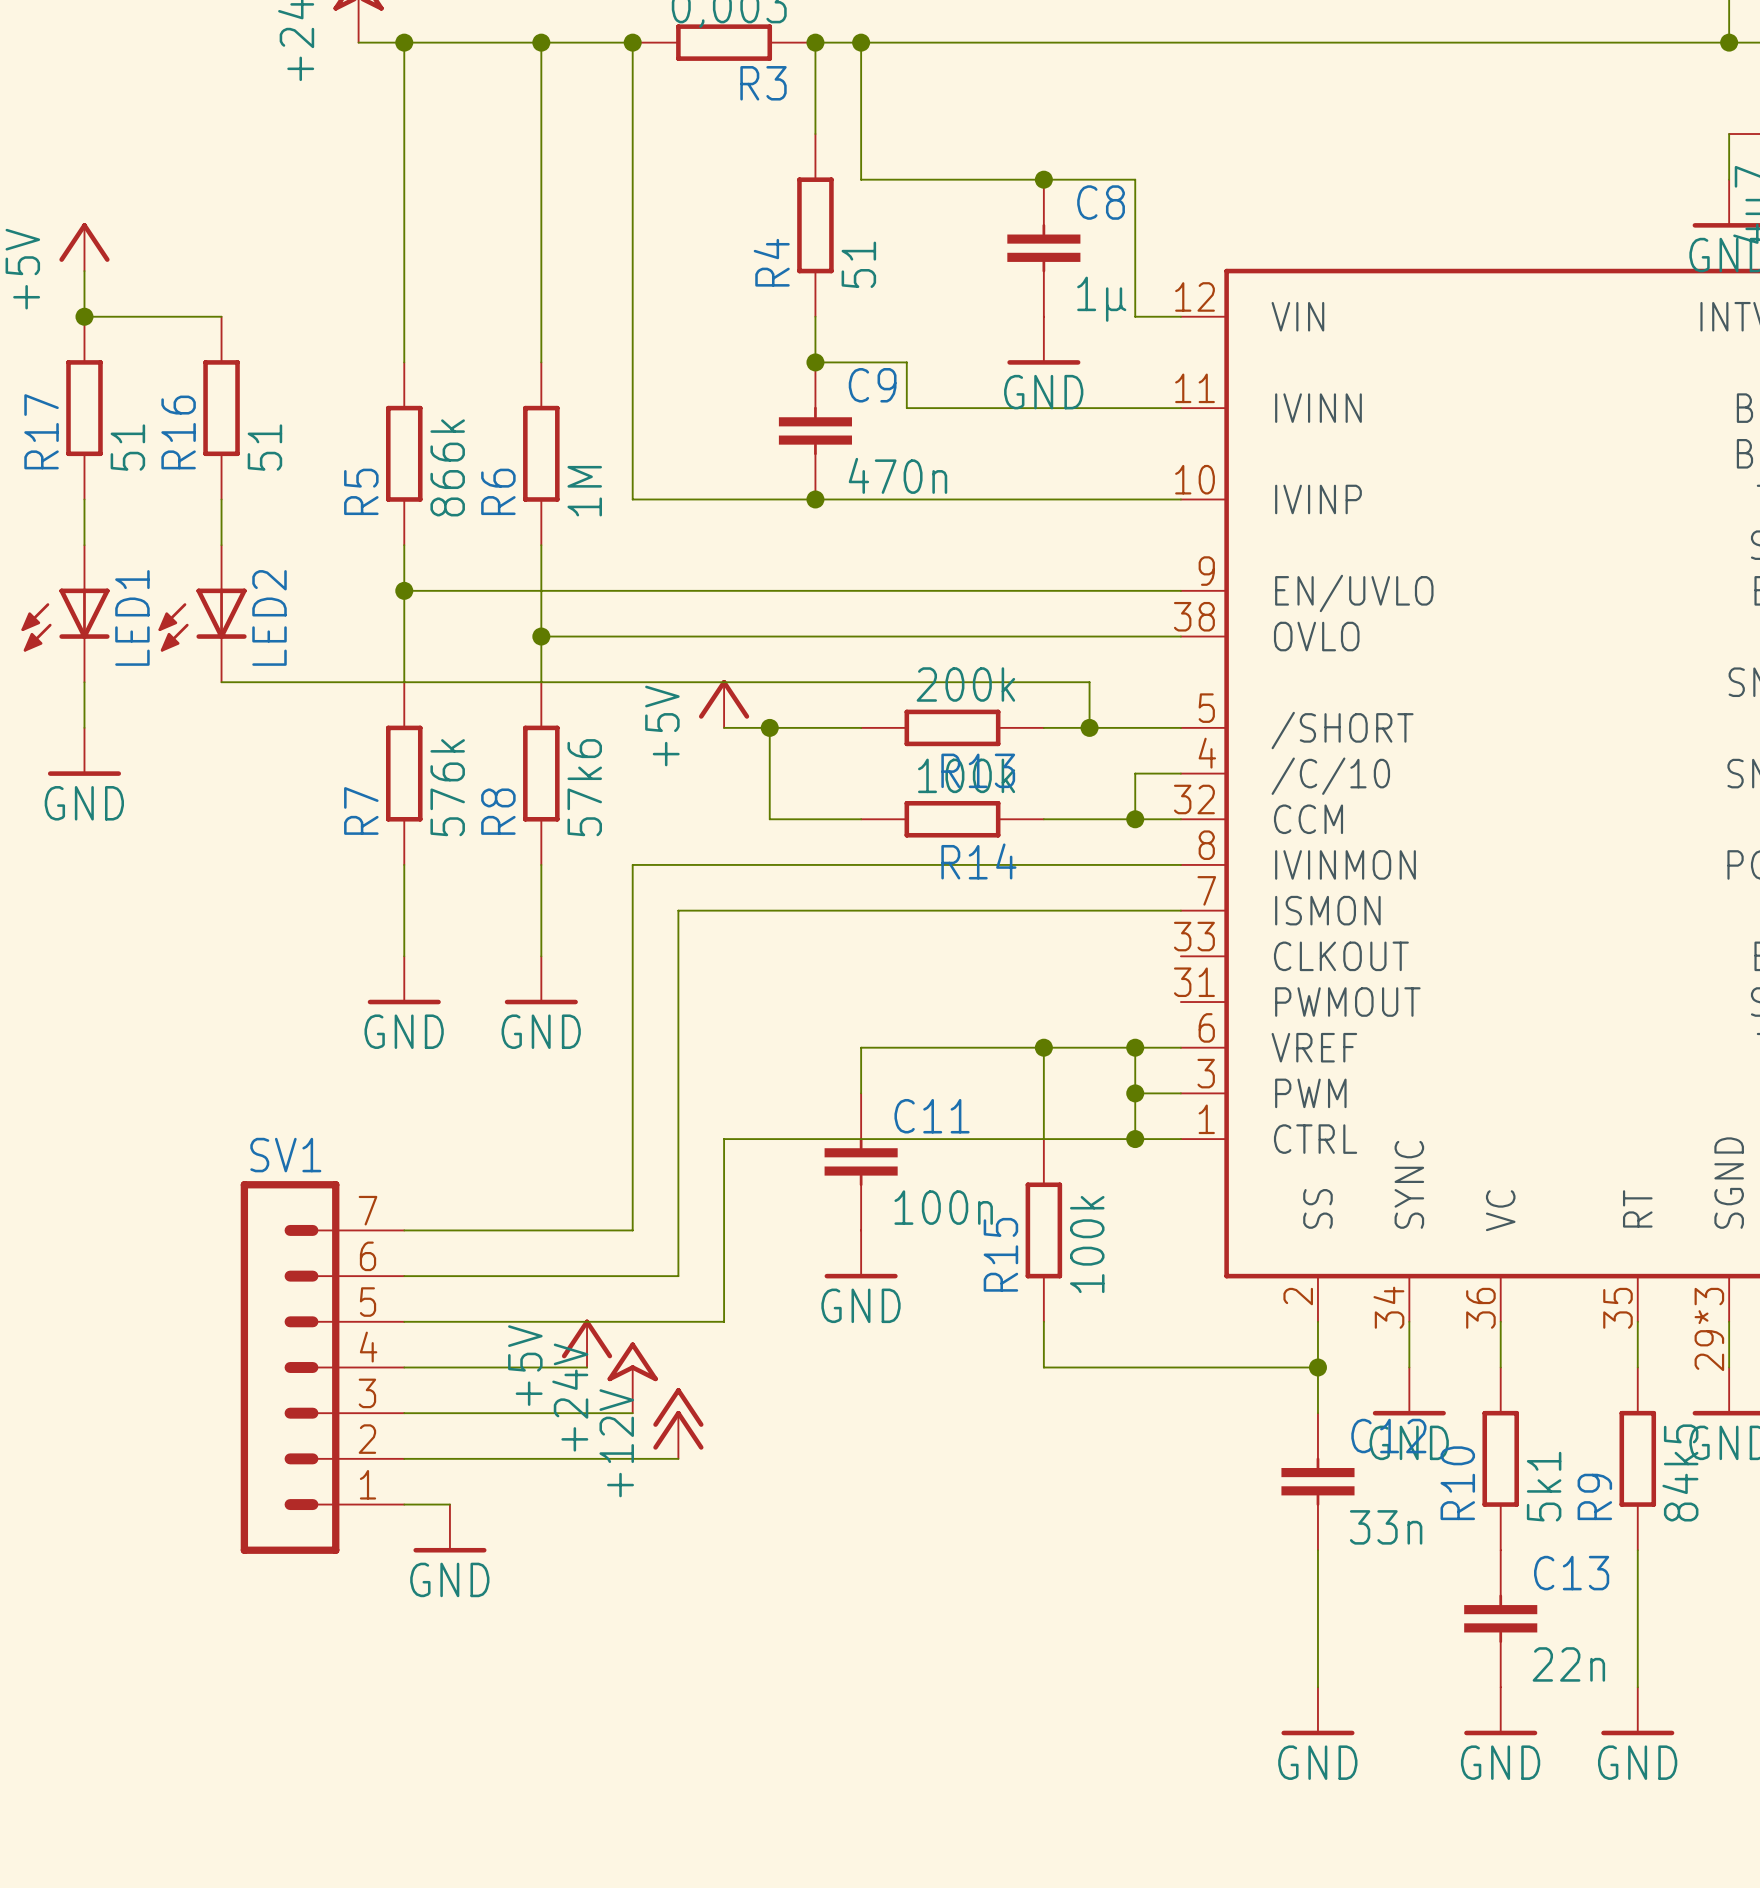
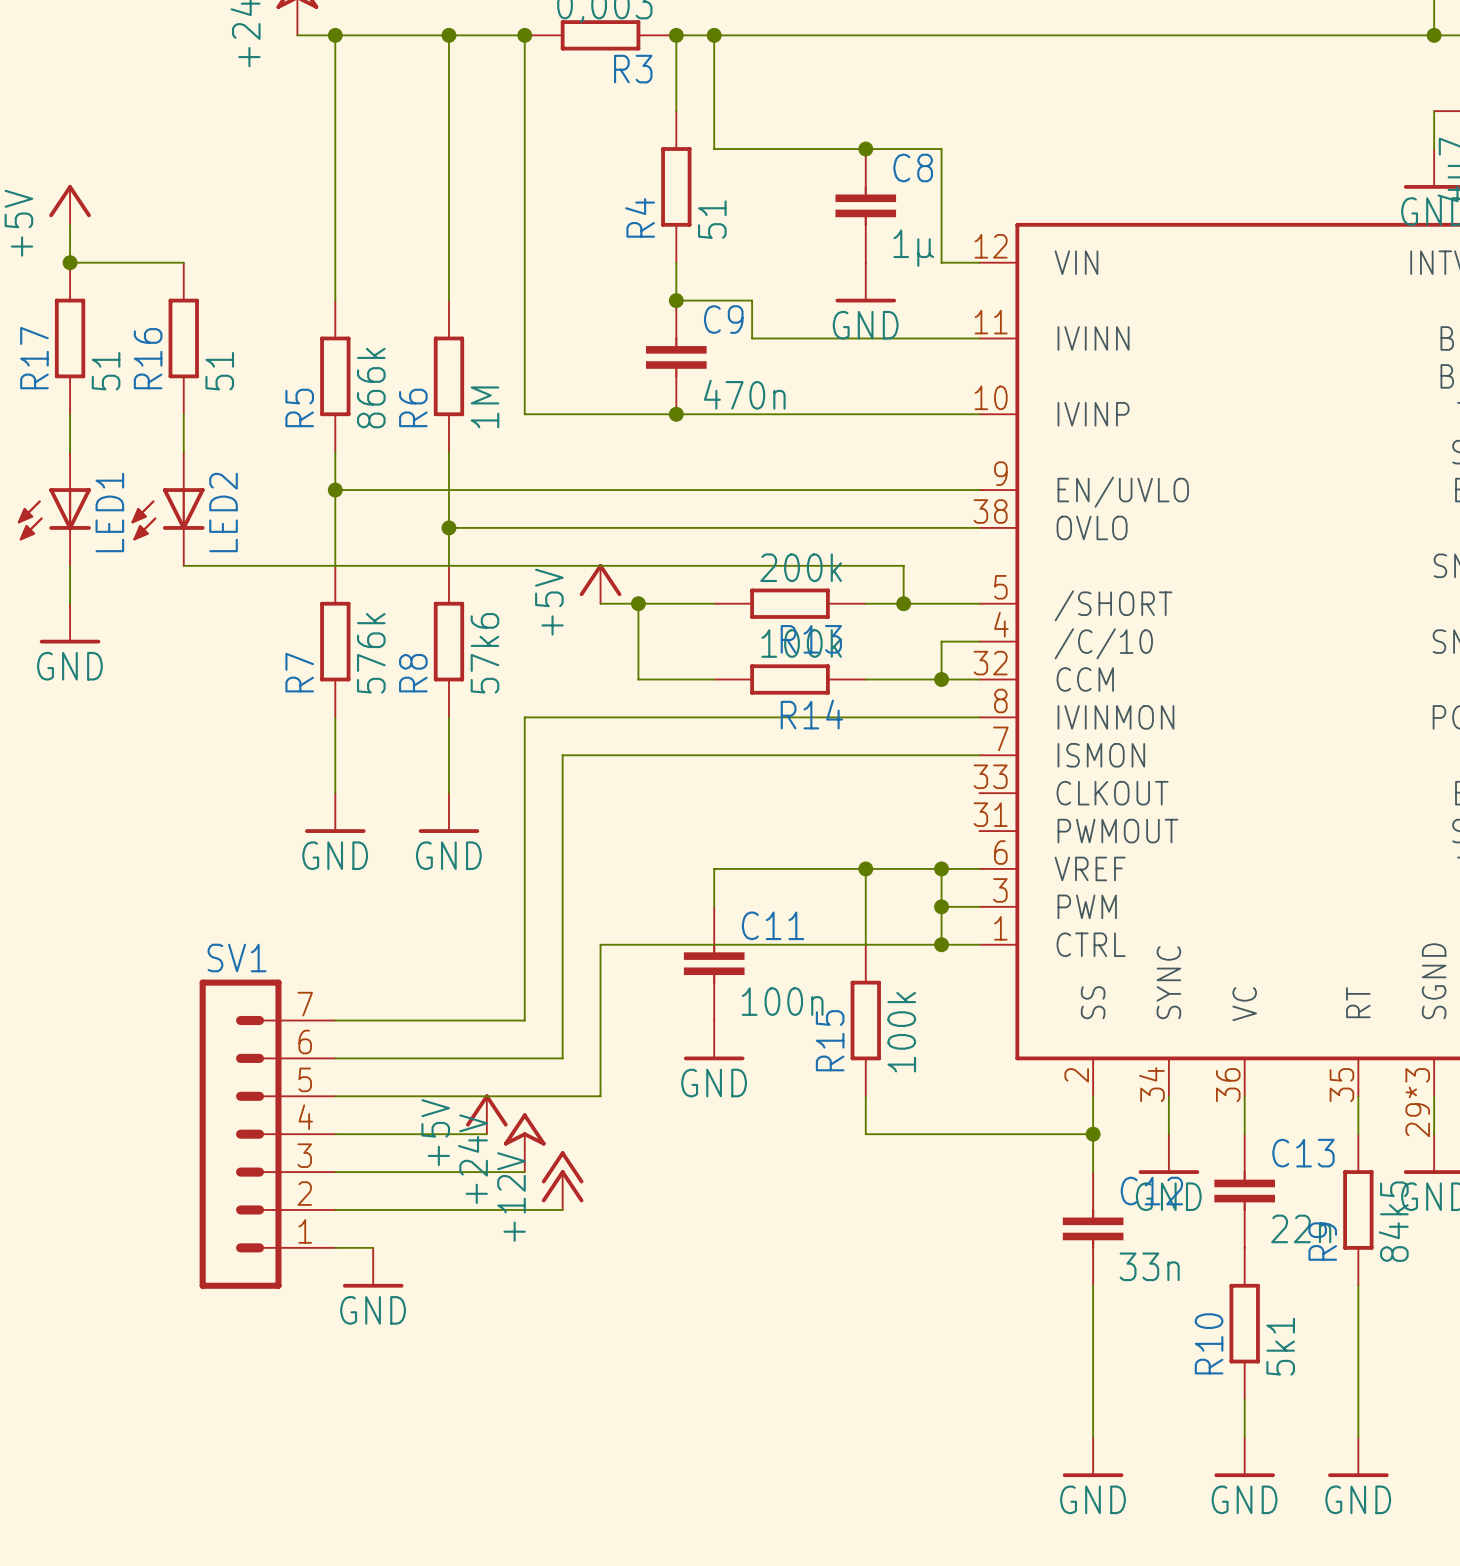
R10 position: (1500, 1458) -> (1244, 1323)
C13 position: (1500, 1618) -> (1244, 1191)
power symbol position: GND (1317, 1711) -> GND (1093, 1457)
power symbol position: GND (1500, 1711) -> GND (1244, 1457)
power symbol position: GND (1637, 1711) -> GND (1358, 1457)

